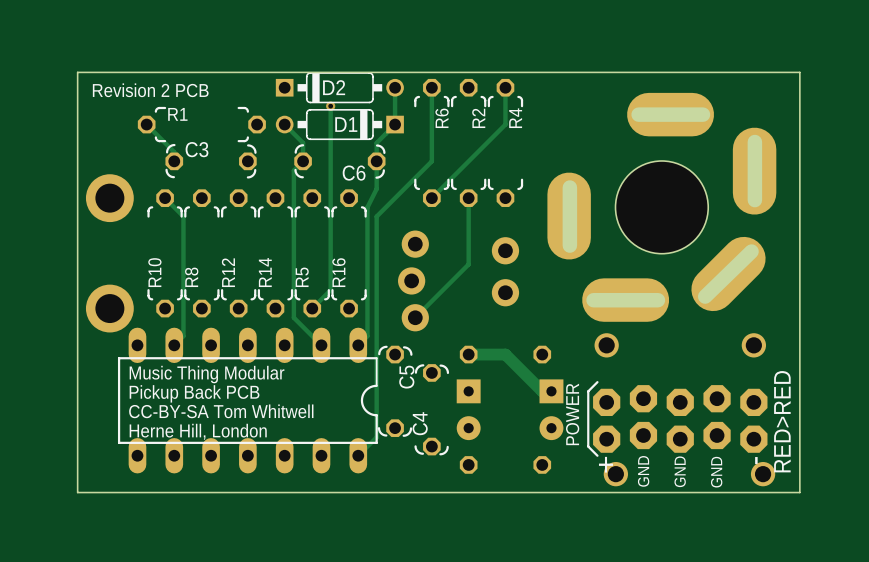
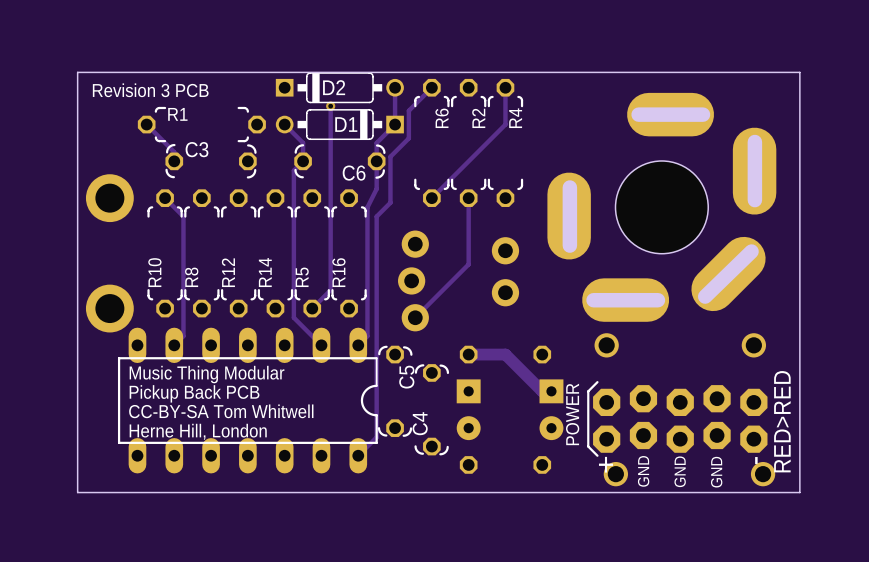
track: (431, 87) (431, 161) (390, 202) -> (431, 87) (408, 110) (408, 138) (390, 156) (390, 202)
text: Revision 2 PCB (150, 90) -> Revision 3 PCB (150, 90)

